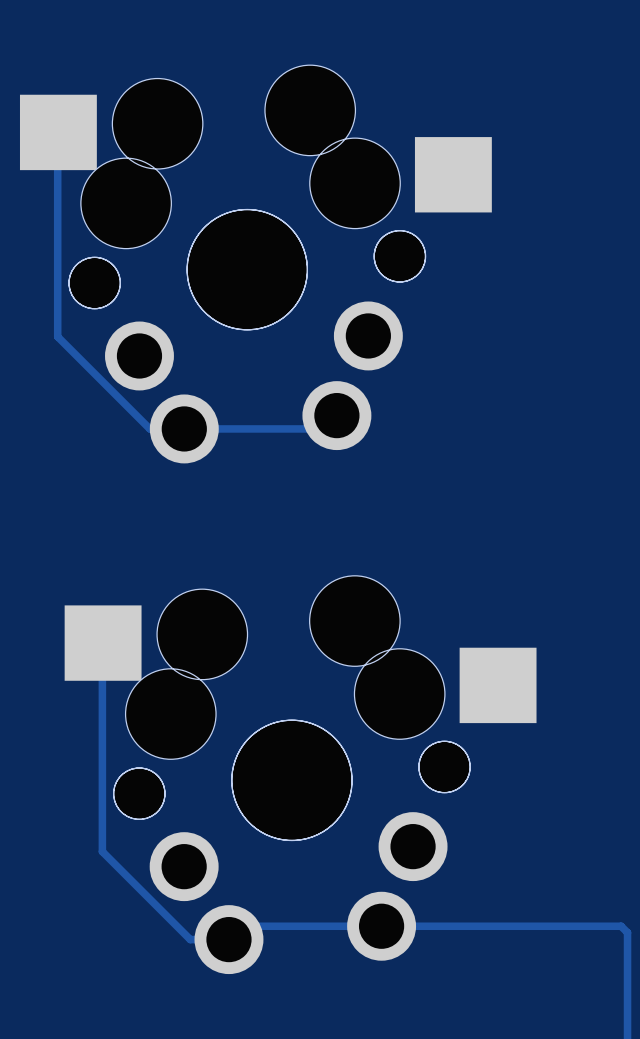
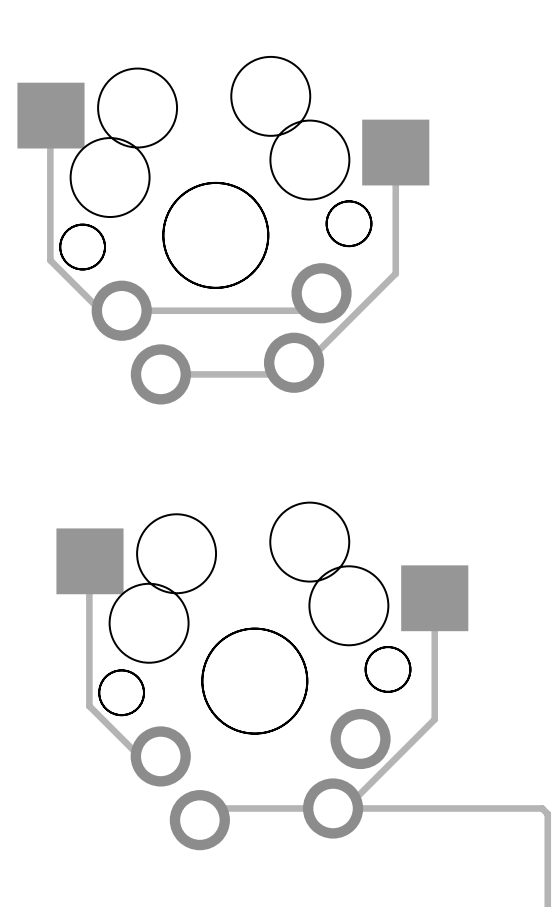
track: none -> (395, 152) (395, 273) (306, 362) (294, 362) (282, 374)
track: (57, 298) (57, 336) (149, 428) (184, 428) -> (50, 260) (100, 310) (304, 310) (321, 293)
track: none -> (434, 598) (434, 719) (345, 808)
track: (102, 808) (102, 851) (190, 939) (228, 939) -> (89, 706) (139, 756) (160, 756)

